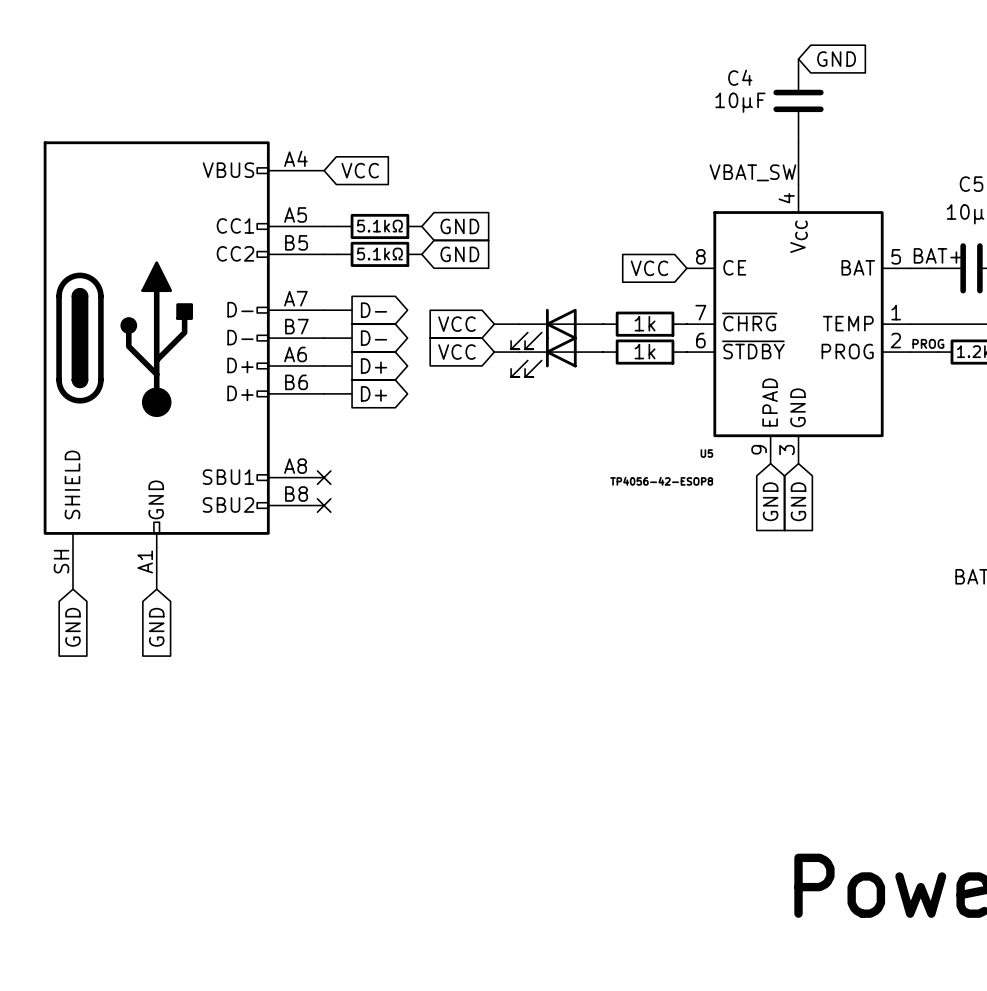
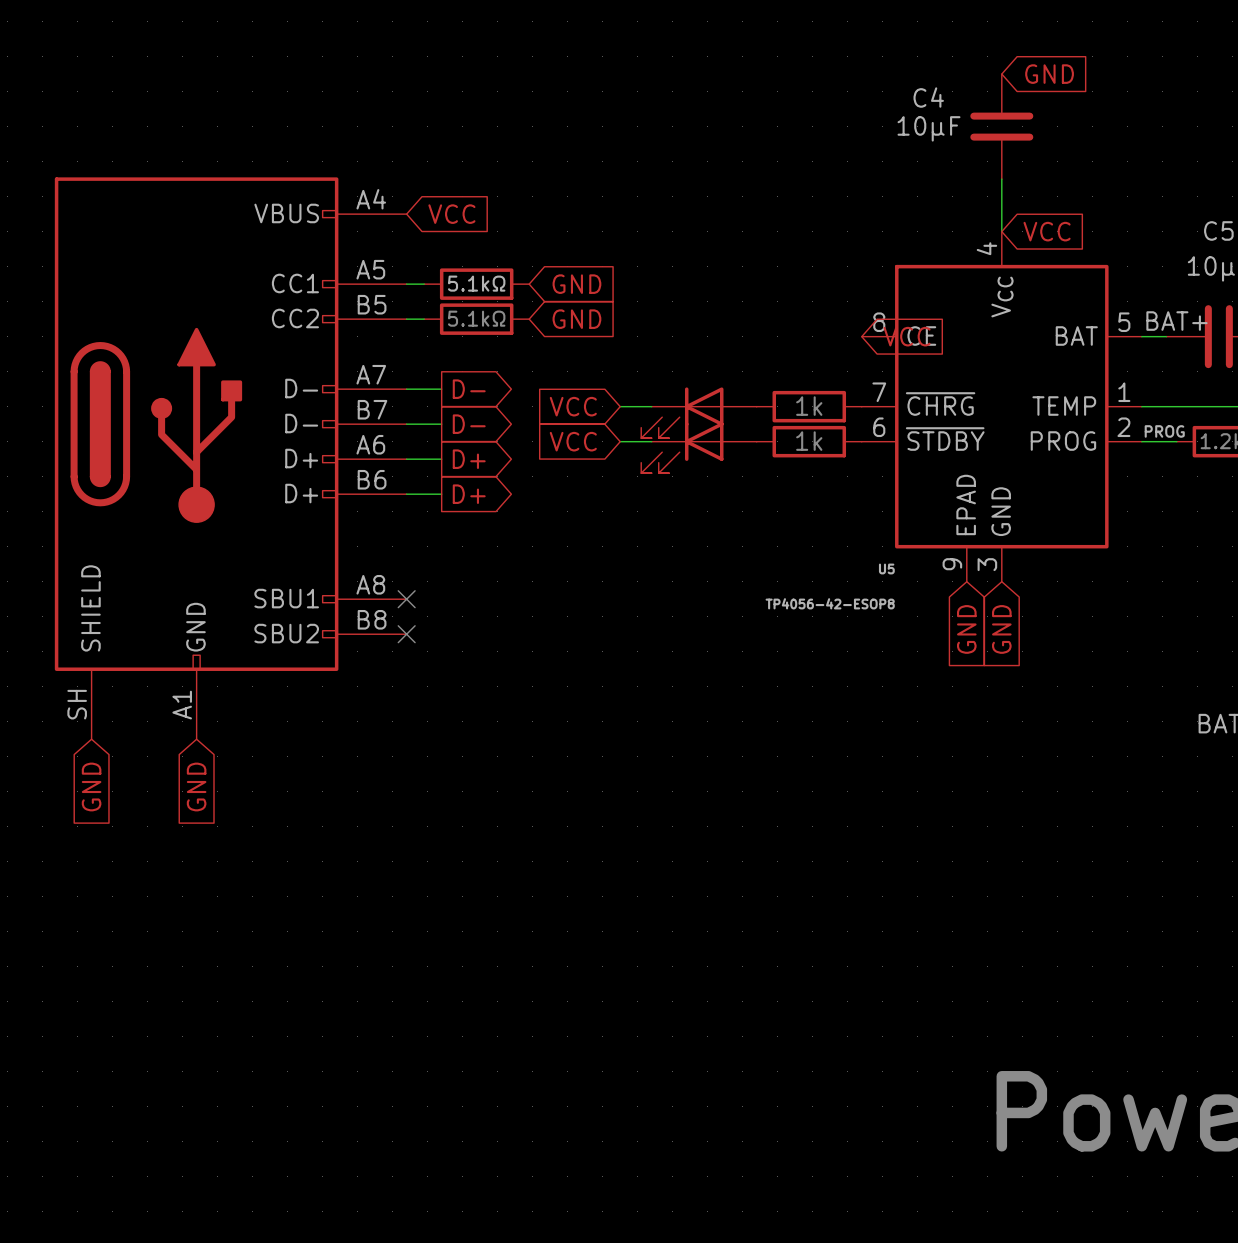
label: VBAT_SW (752, 172) -> none
global label: none -> VCC (1047, 231)
global label rotation: 0° (649, 268) -> 180° (907, 336)
global label position: VCC (649, 268) -> VCC (907, 336)

